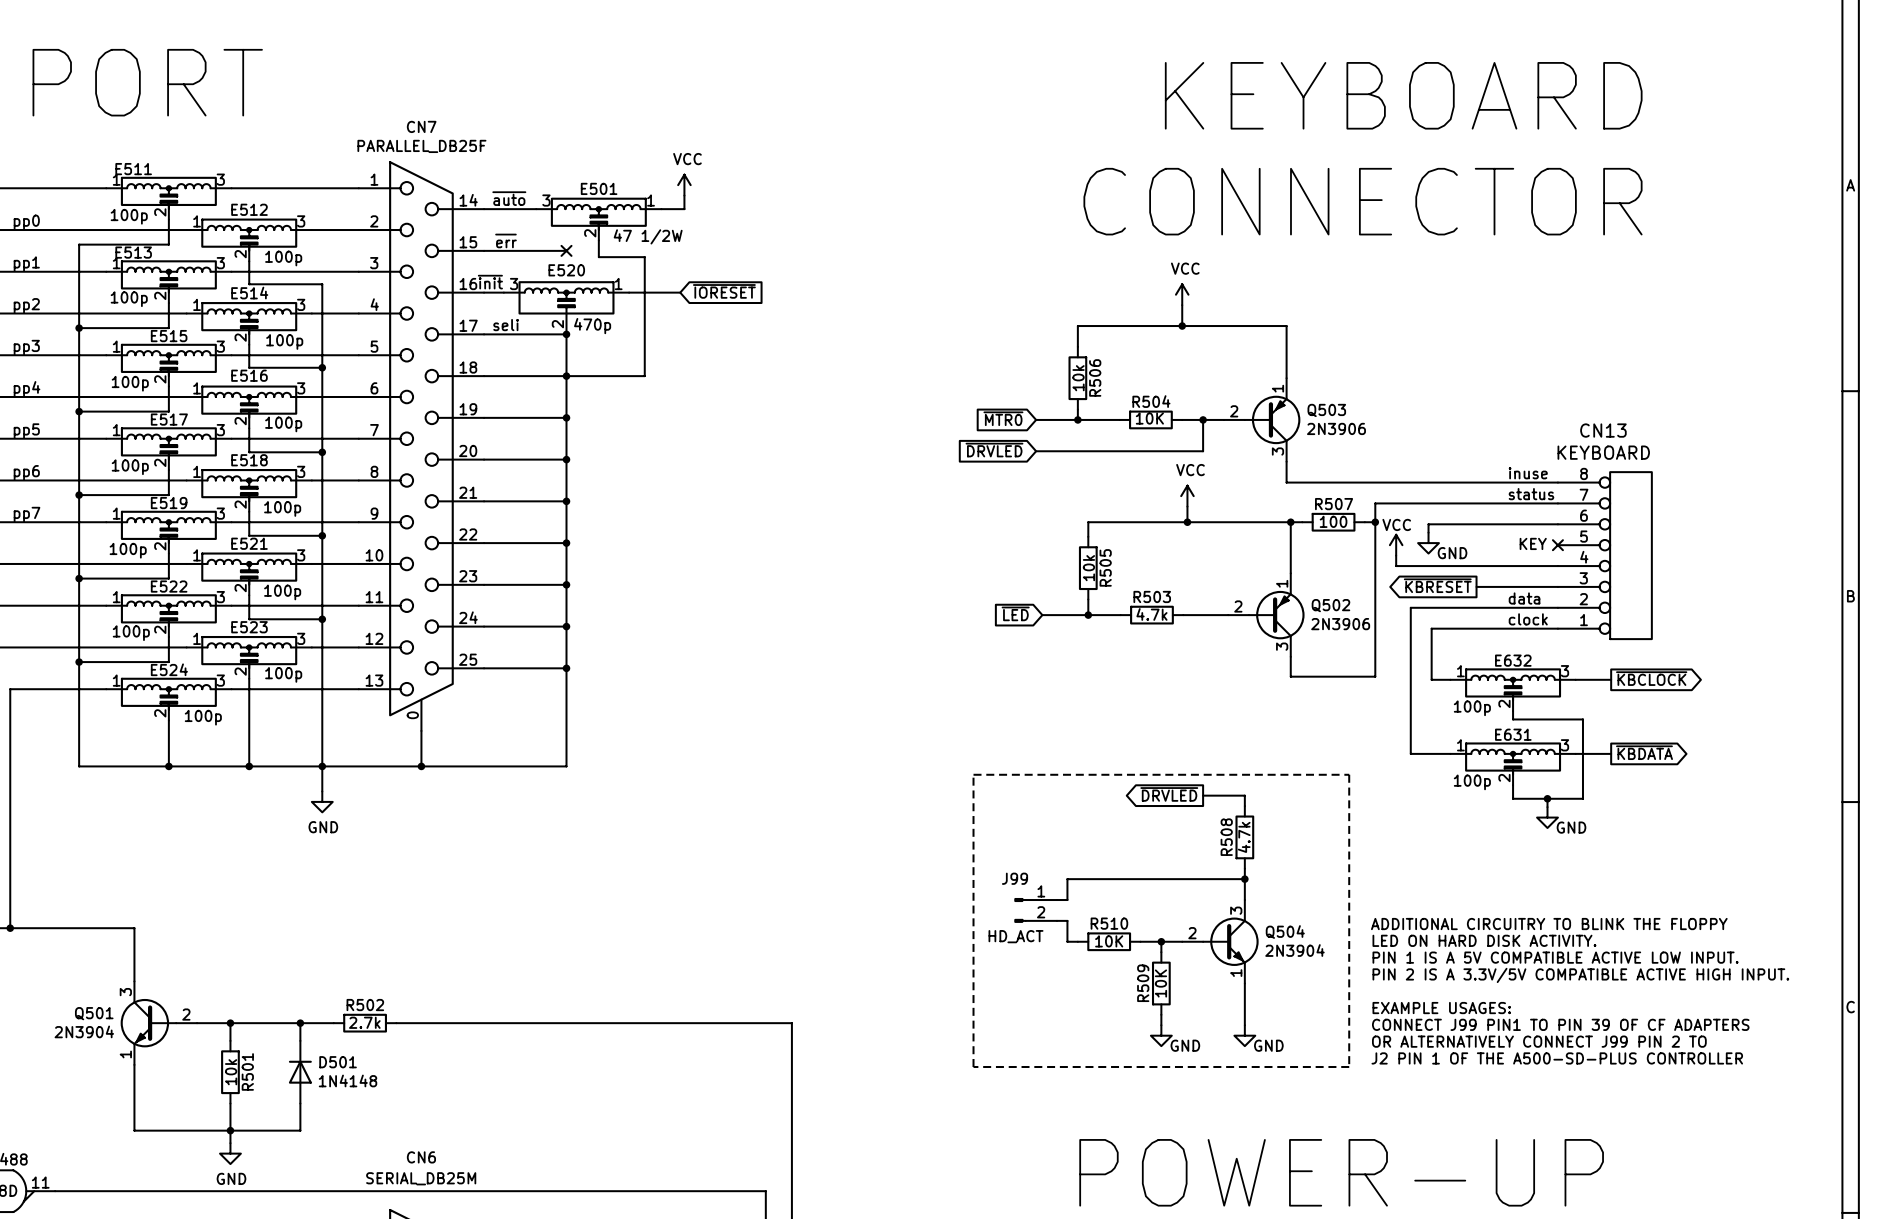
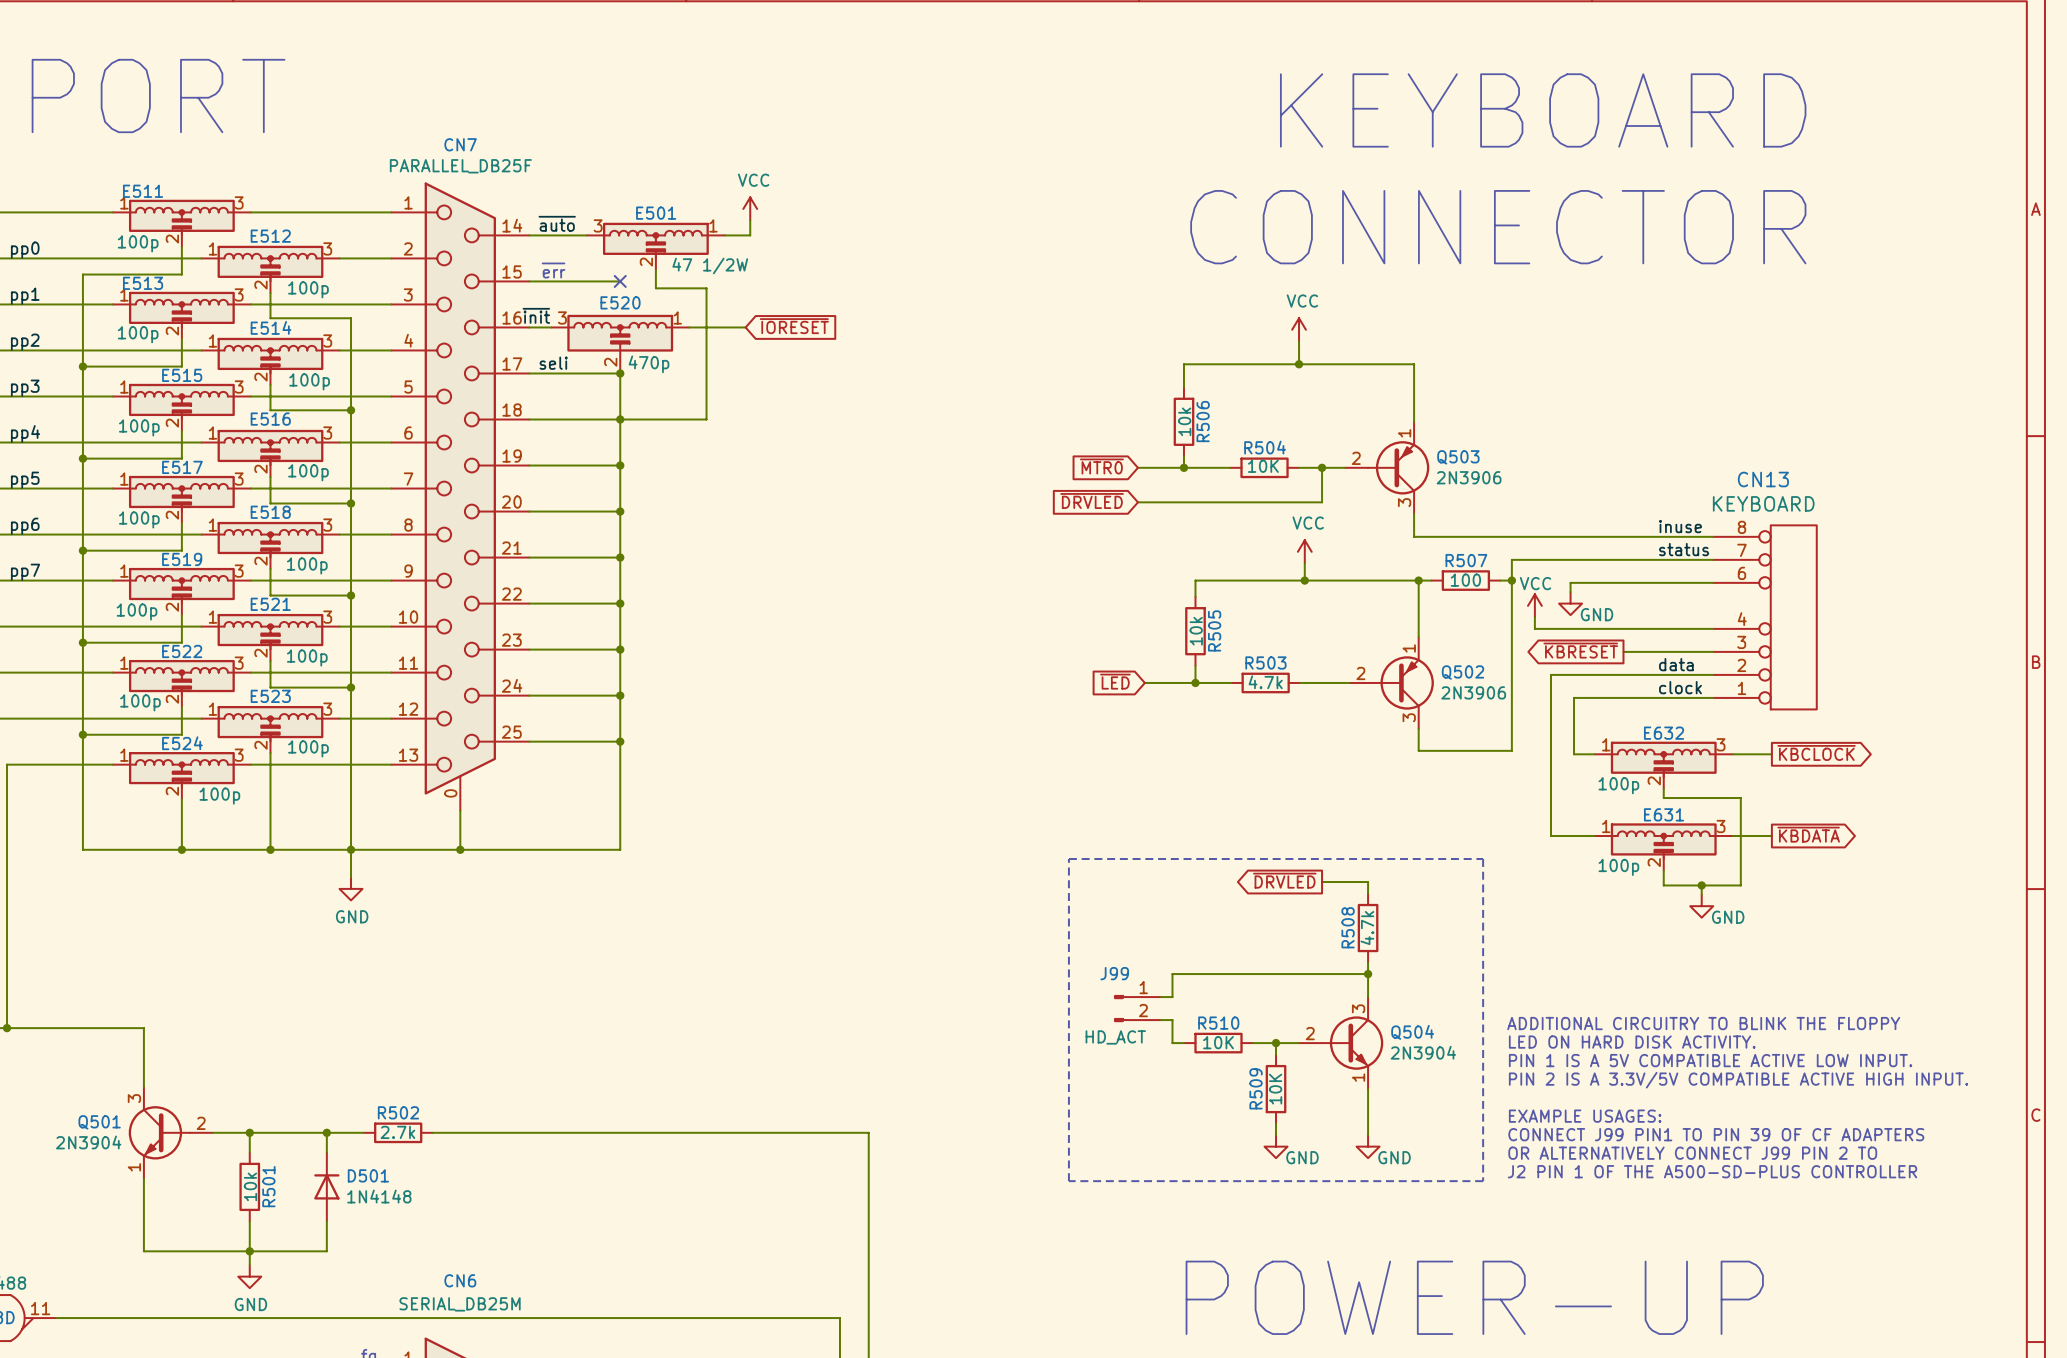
CN13 symbol: [1557, 472, 1652, 640] -> [1713, 525, 1817, 710]
text: KEY (1533, 543) -> none
no-connect mark: (1557, 545) -> none

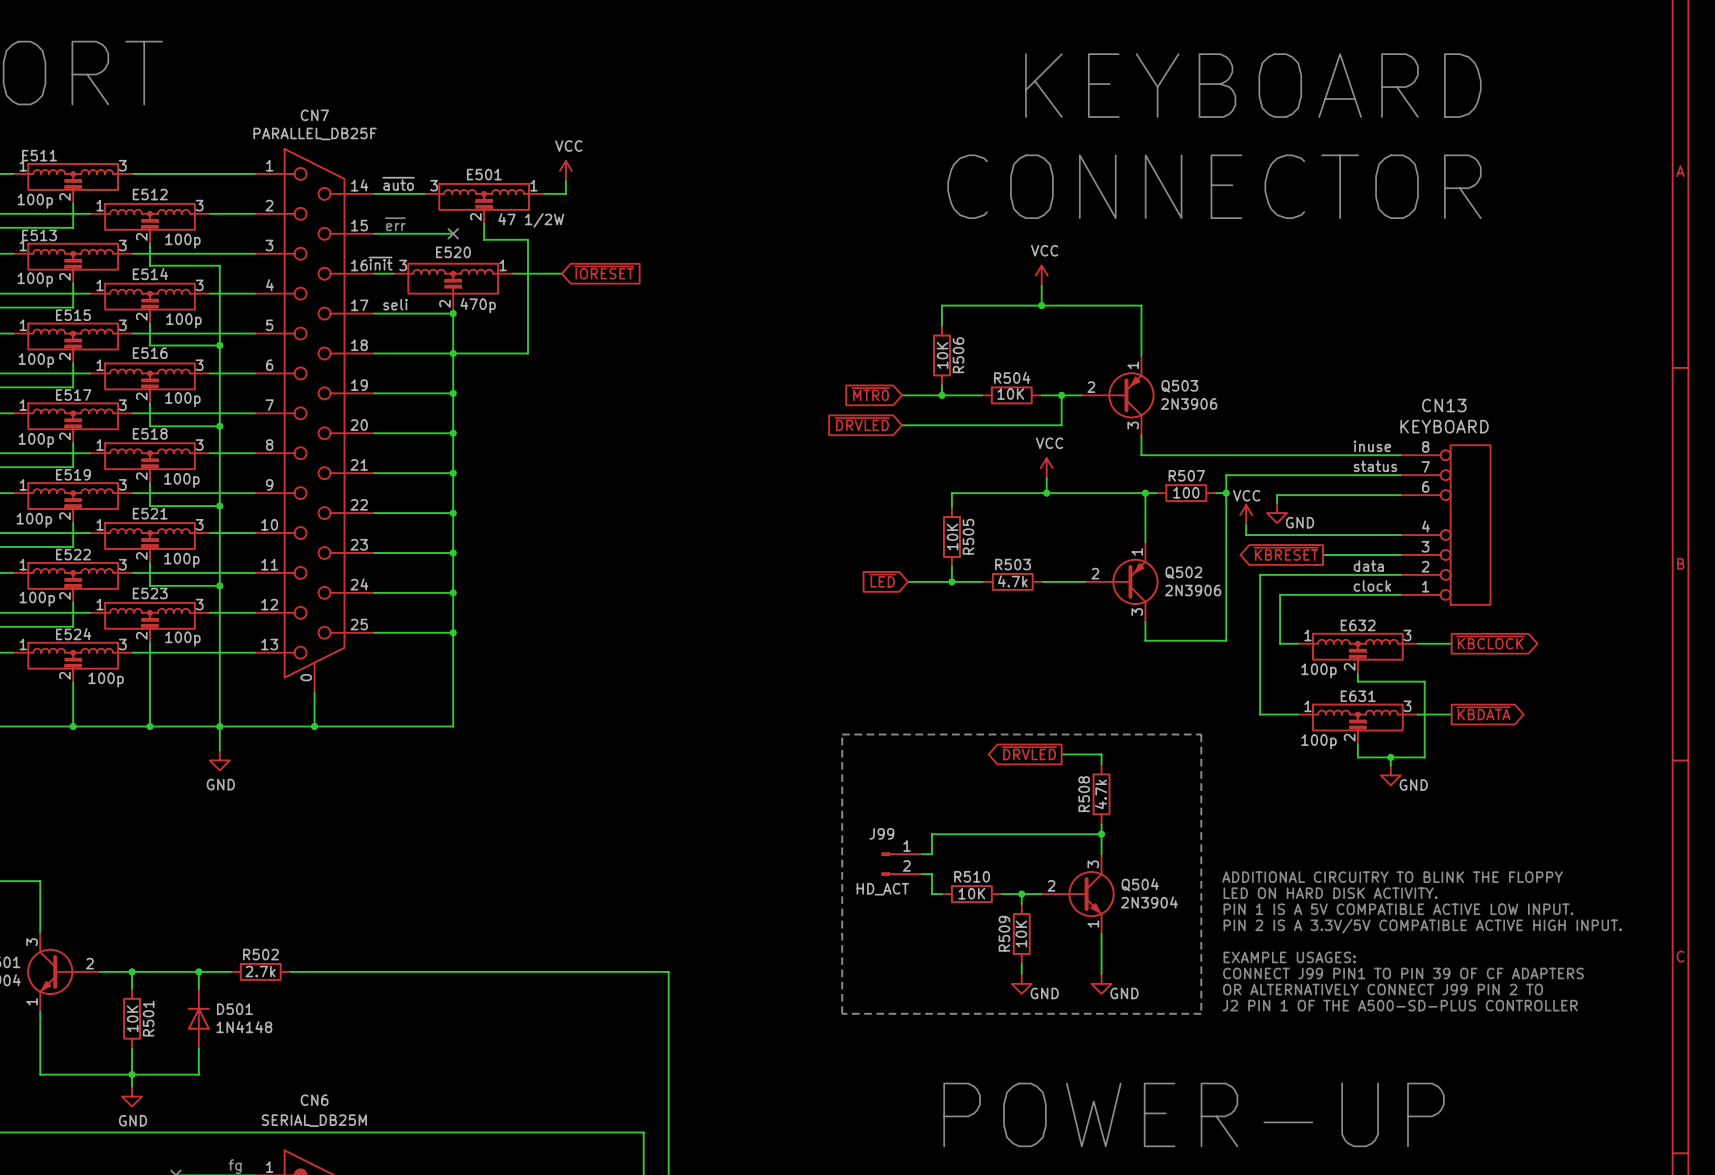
R506 value: 10k (1184, 421) -> 10K (942, 355)
R505 value: 10k (1196, 631) -> 10K (952, 537)
R501 value: 10k (250, 1186) -> 10K (132, 1018)

